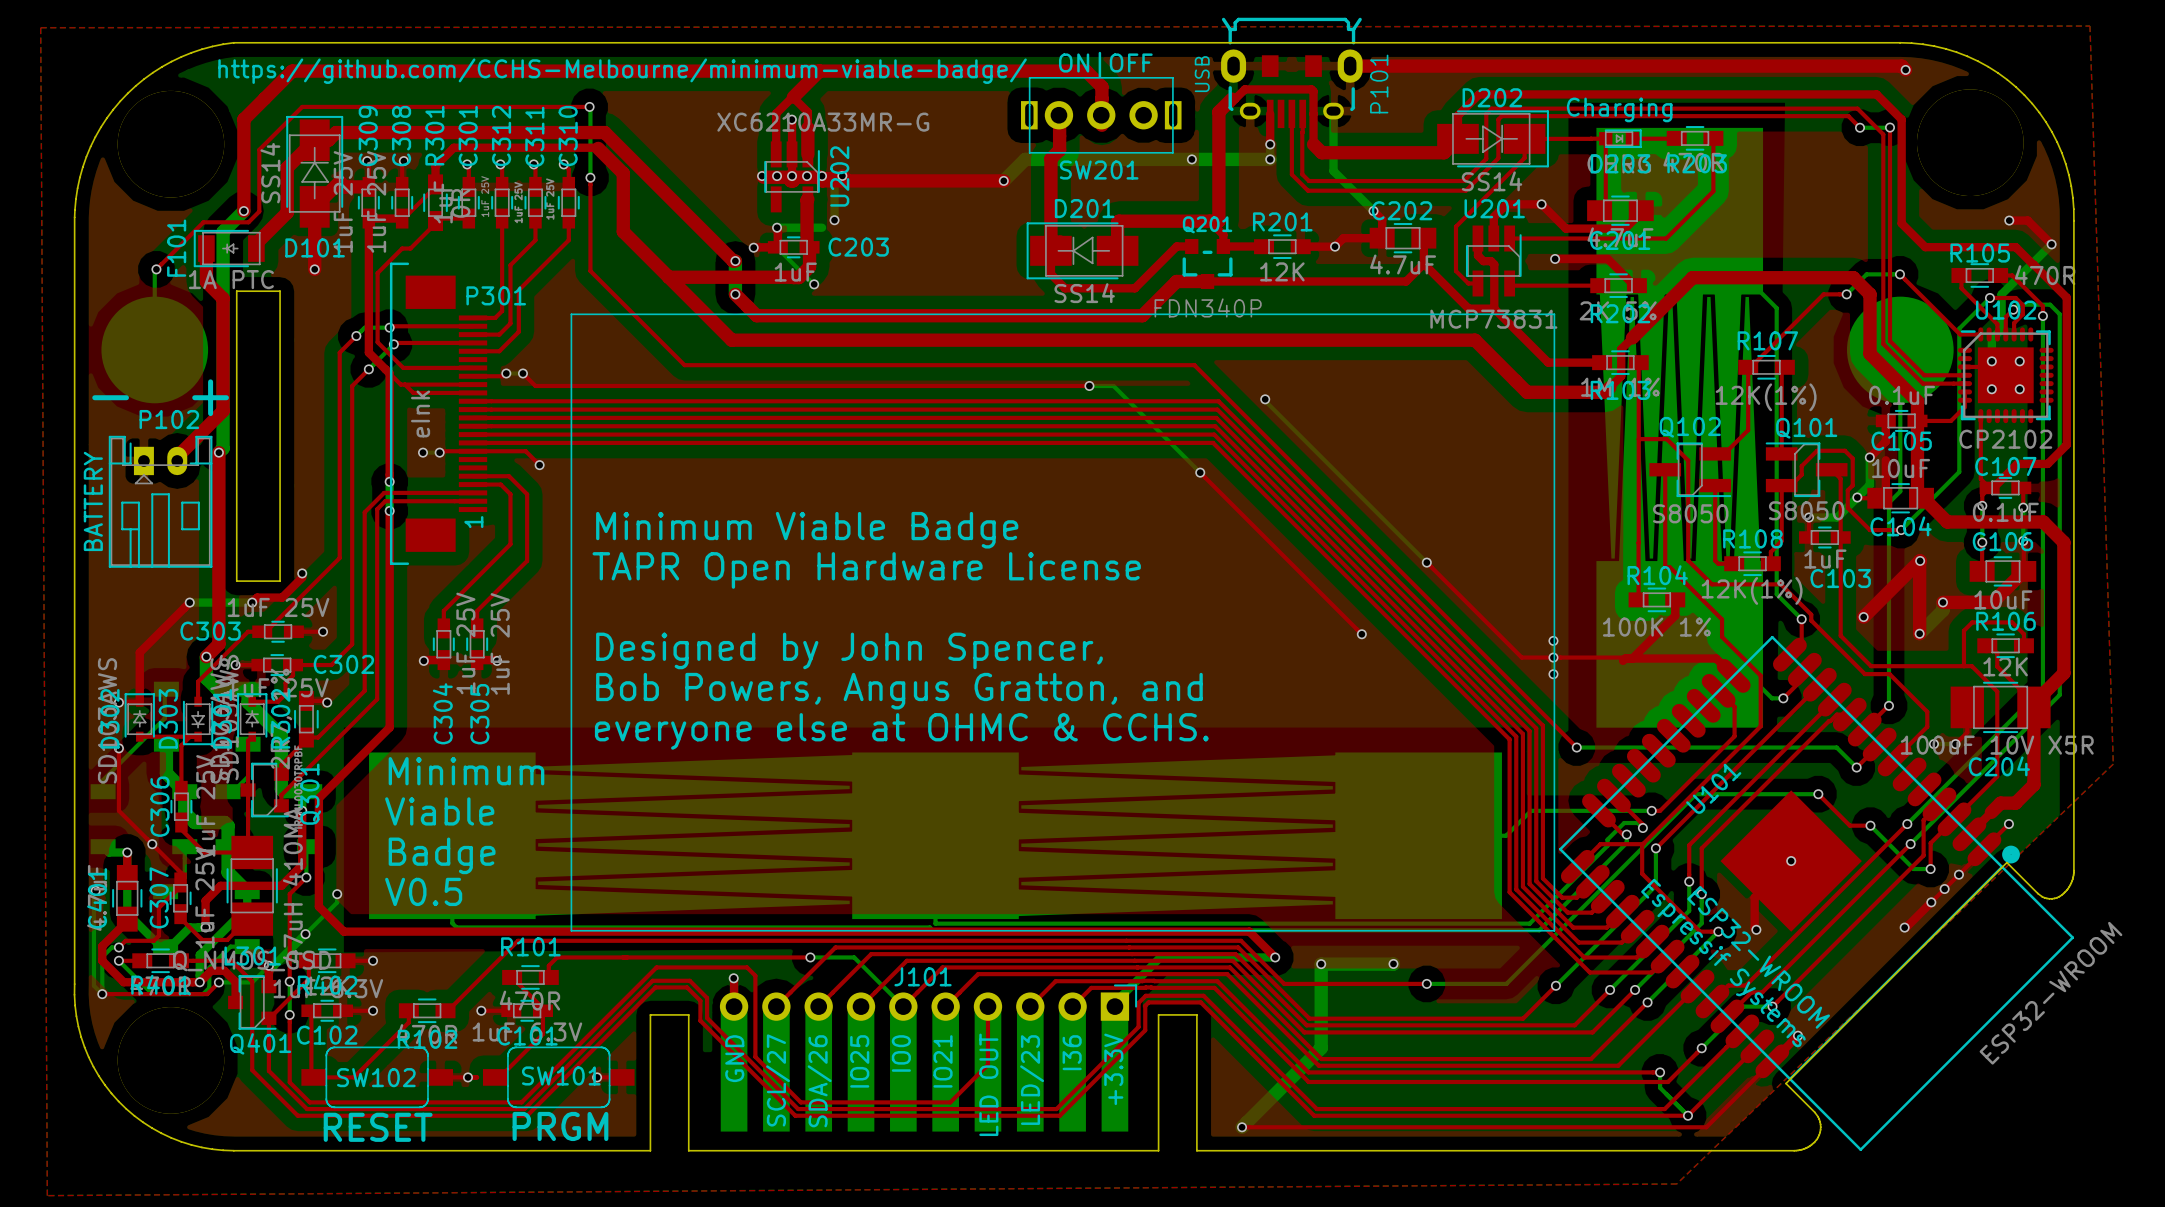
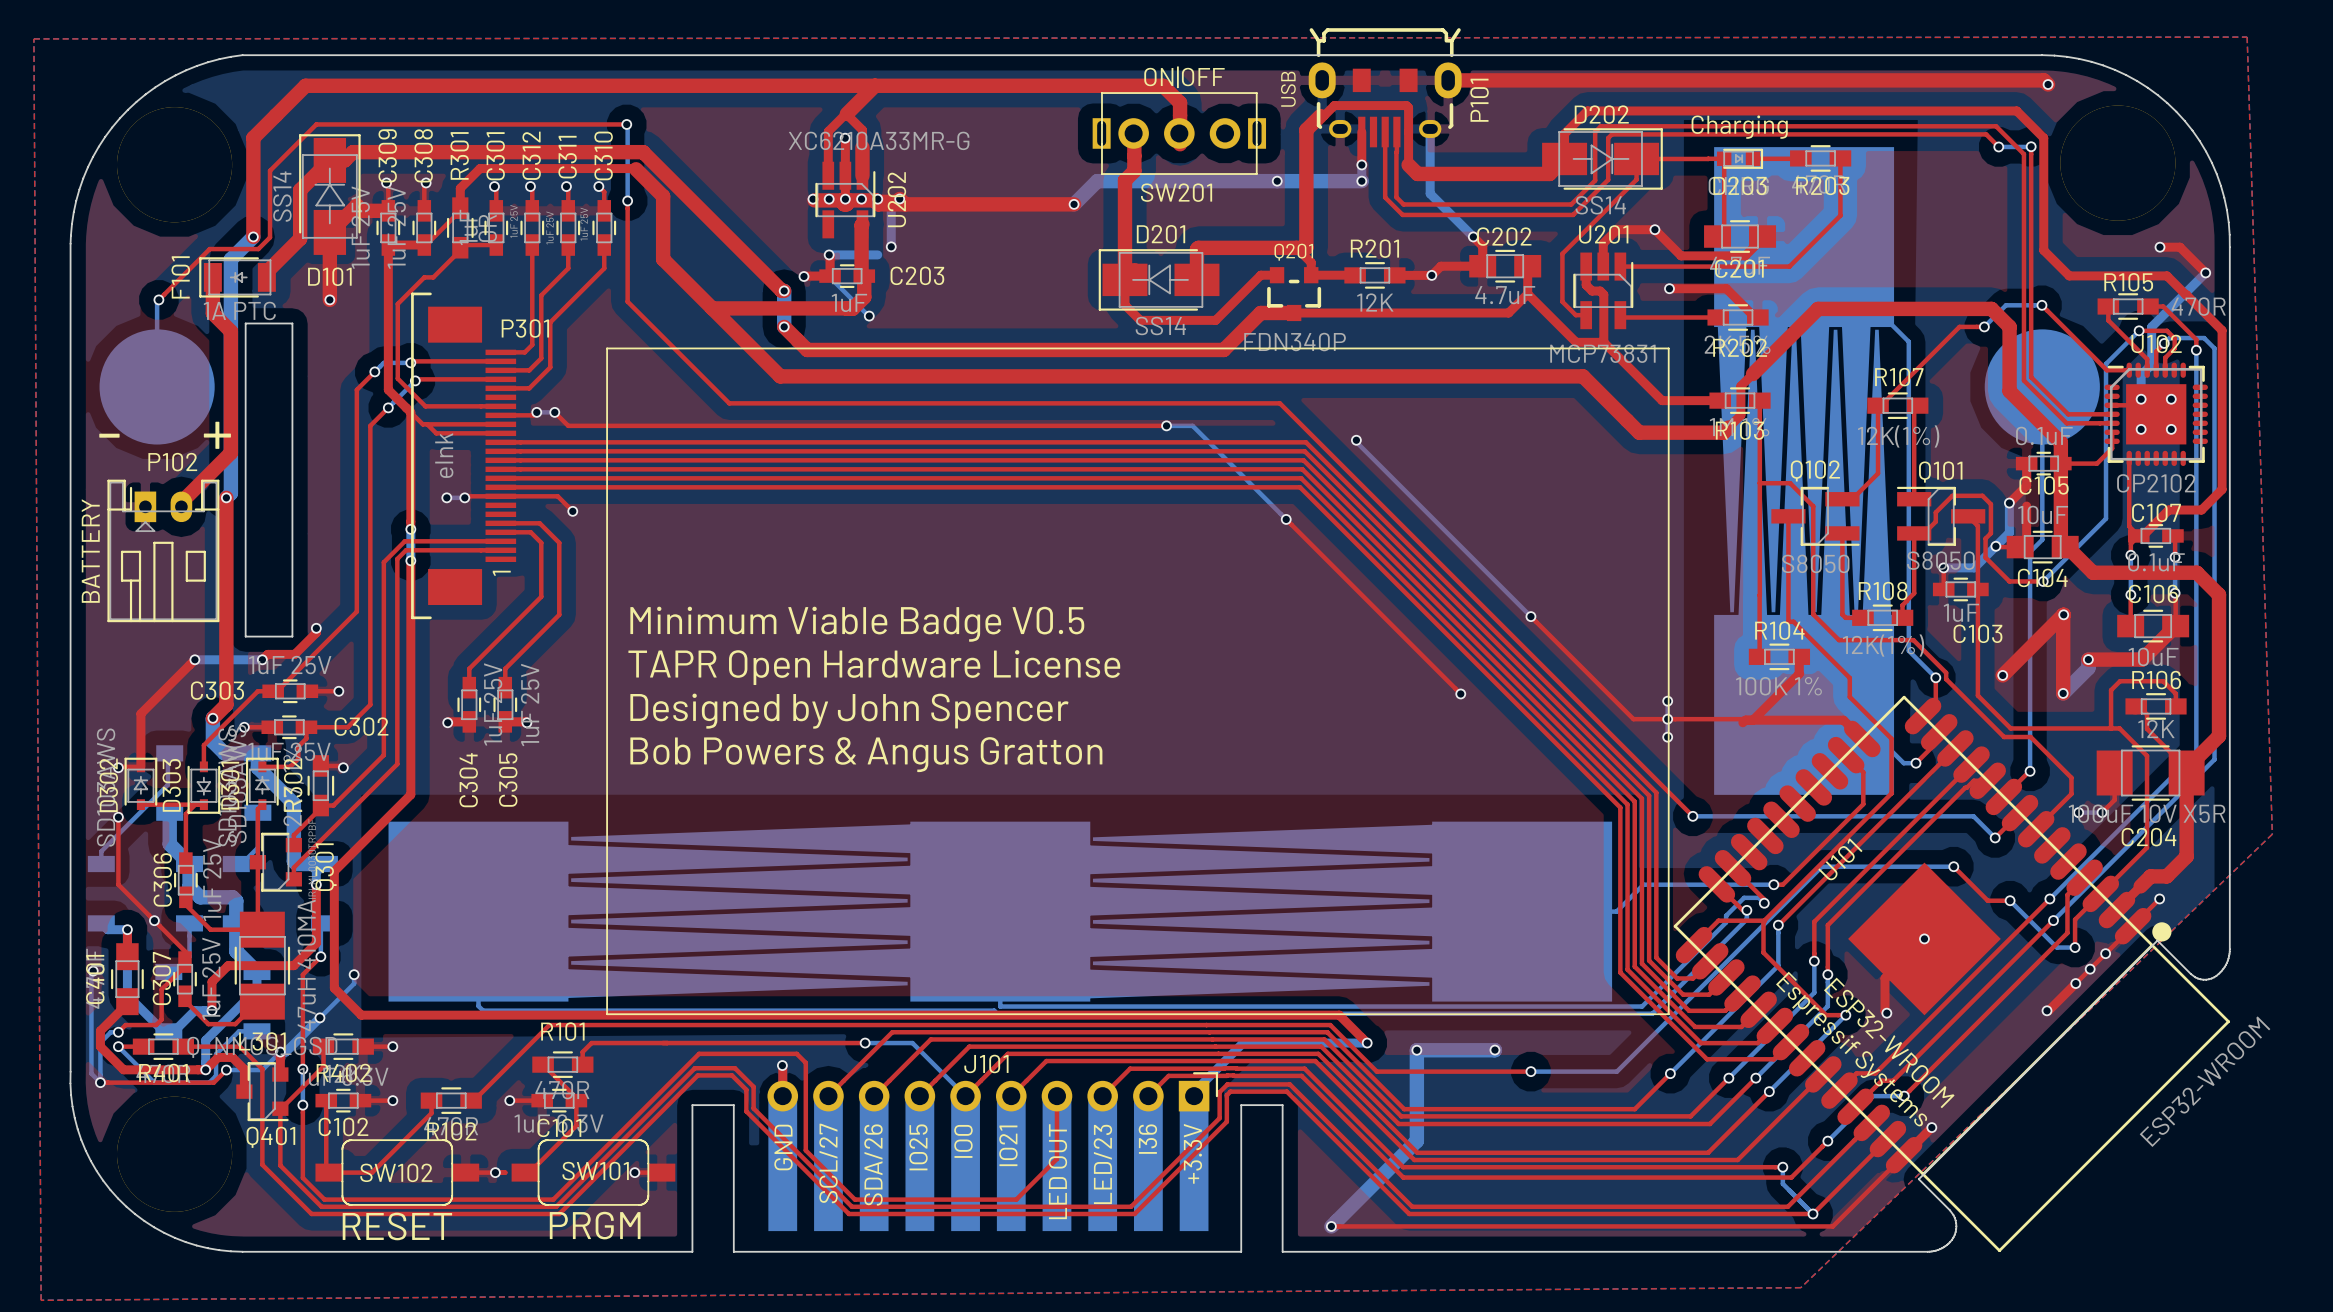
text: https://github.com/CCHS-Melbourne/minimum-viable-badge/ (622, 71) -> none
text: Minimum Viable Badge (807, 530) -> none
text: TAPR Open Hardware License (866, 570) -> Minimum Viable Badge V0.5 (857, 624)
text: none -> TAPR Open Hardware License (874, 667)
text: Designed by John Spencer, (849, 650) -> Designed by John Spencer (849, 711)
text: Bob Powers, Angus Gratton, and (899, 691) -> Bob Powers & Angus Gratton (866, 754)
text: everyone else at OHMC & CCHS. (901, 731) -> none
text: Minimum (466, 771) -> none
text: Viable (439, 811) -> none
text: Badge (442, 855) -> none
text: V0.5 (423, 891) -> none

